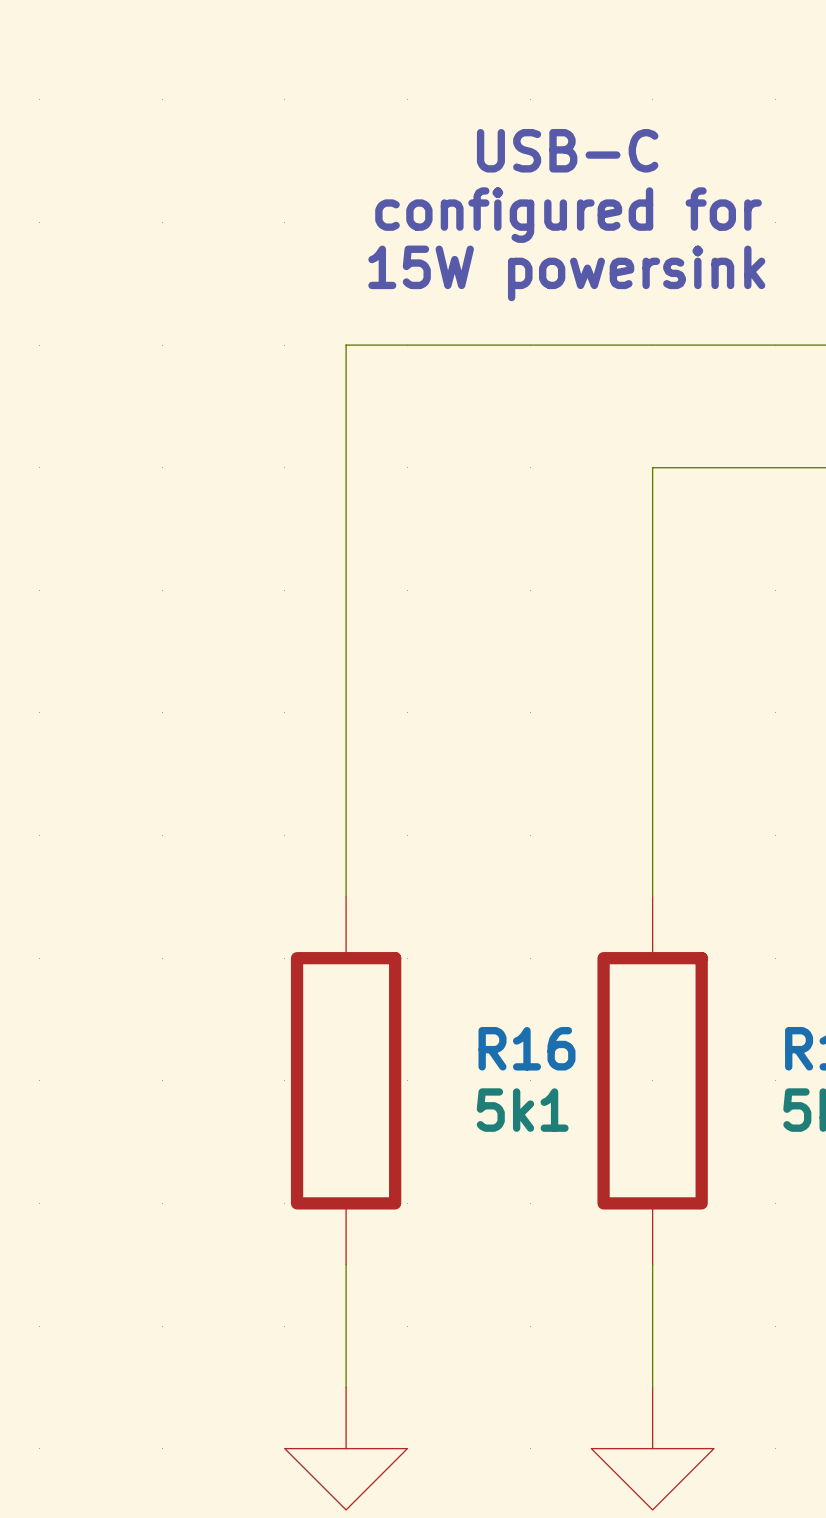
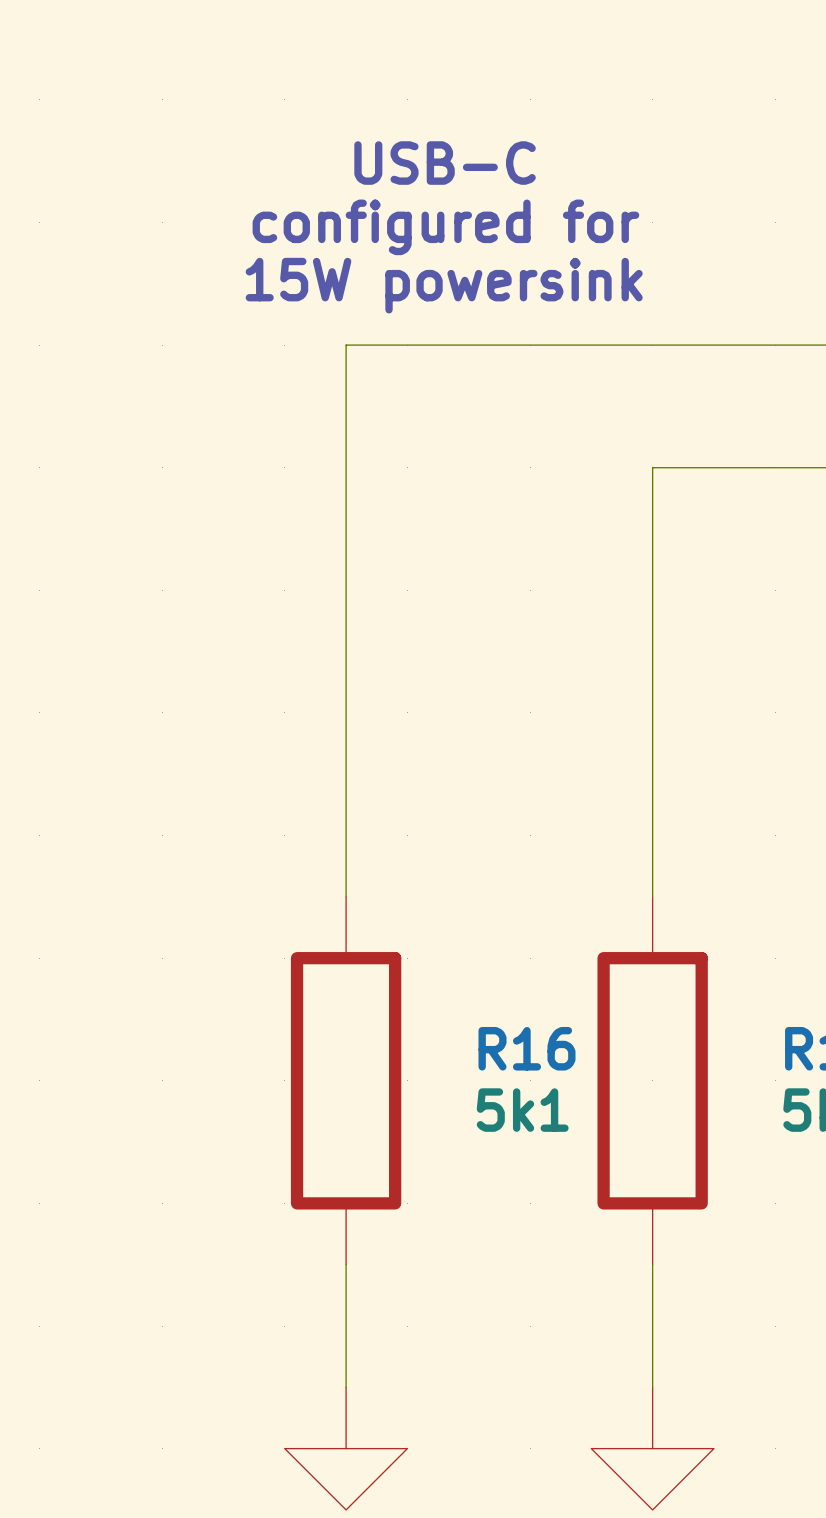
text position: USB-C (567, 150) -> USB-C (445, 163)
text position: configured for (568, 215) -> configured for (445, 227)
text position: 15W powersink (566, 273) -> 15W powersink (444, 285)

